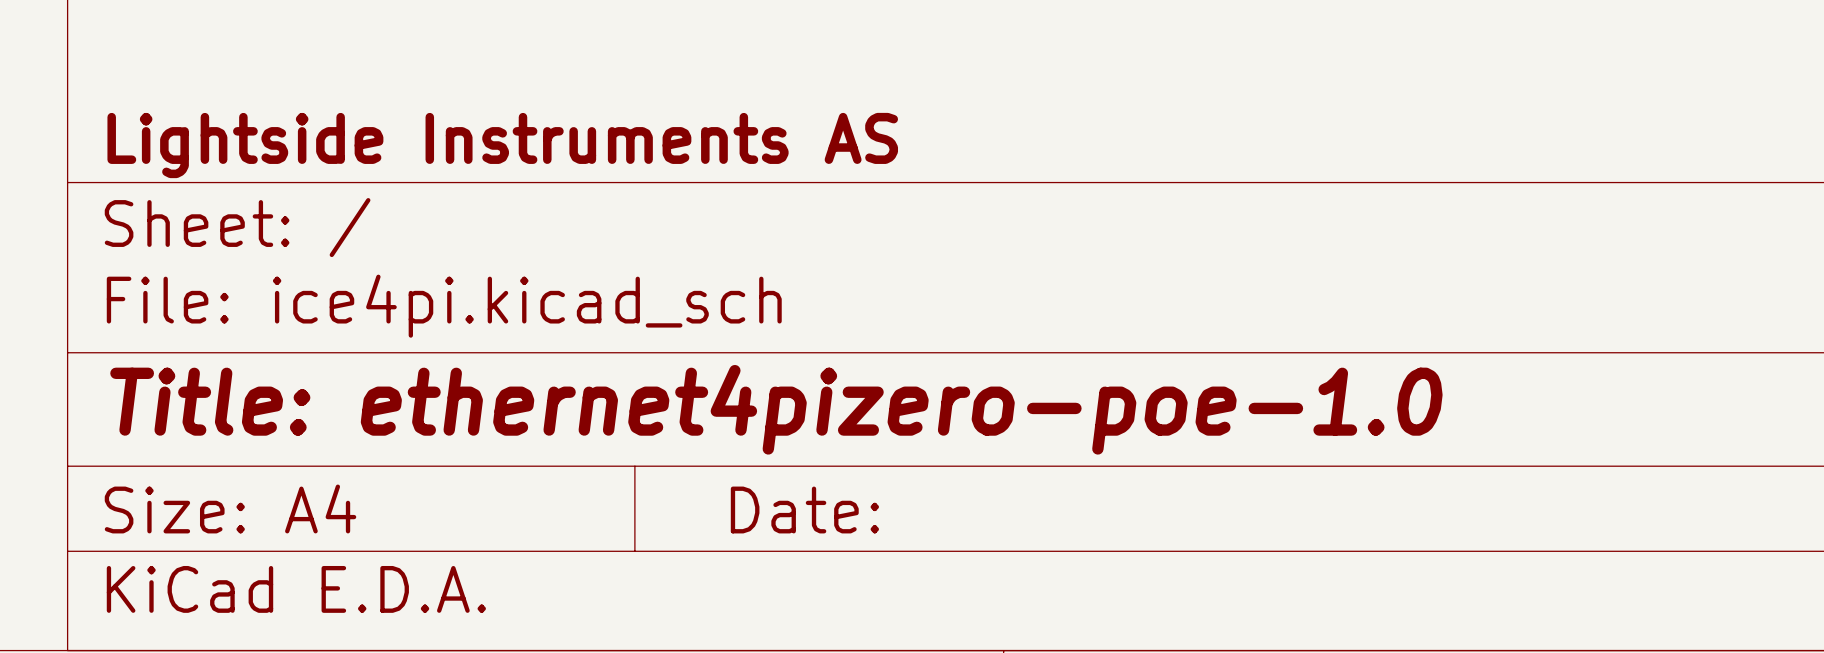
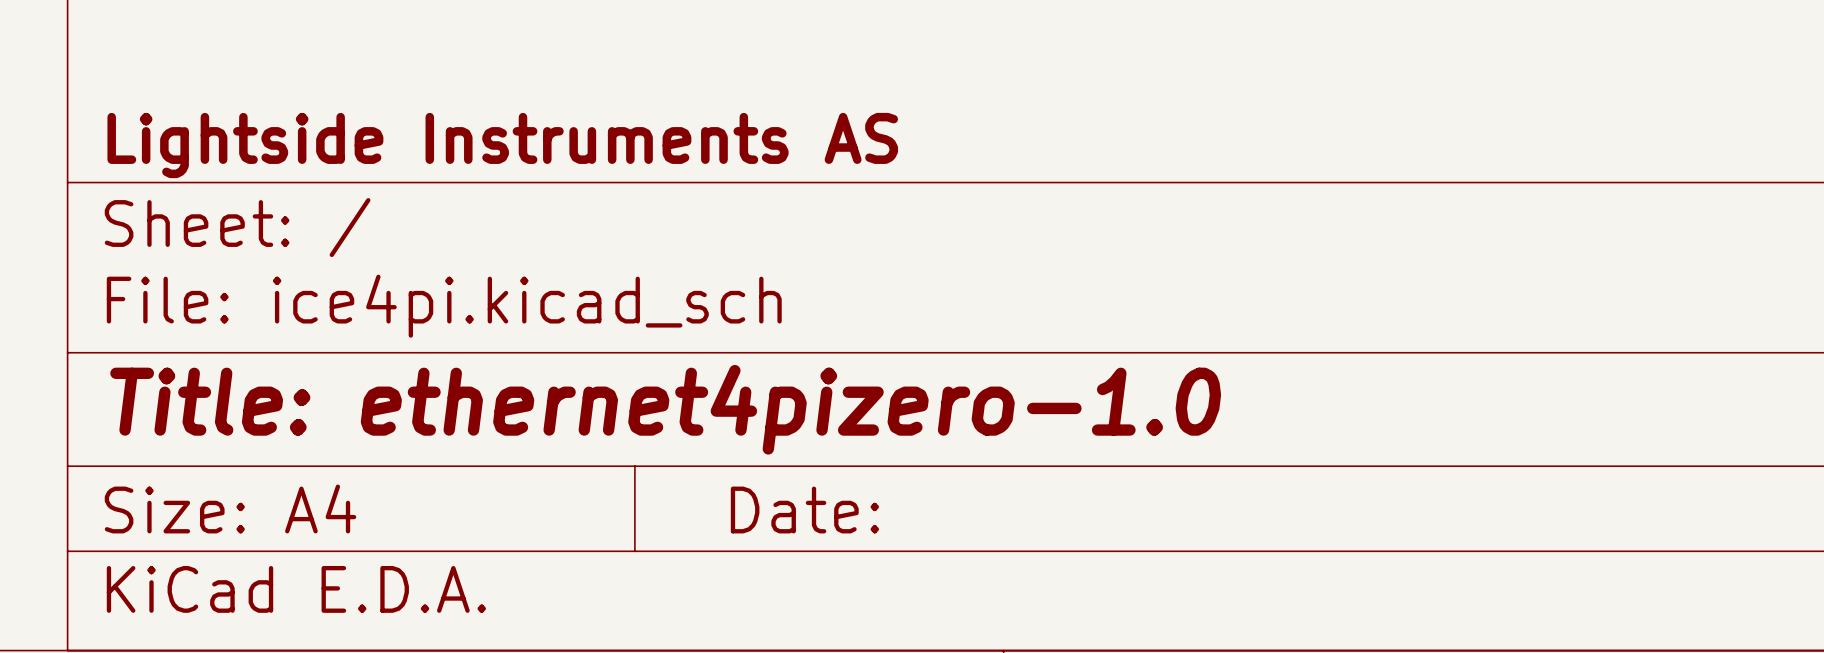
title block: Title: ethernet4pizero-poe-1.0 (776, 409) -> Title: ethernet4pizero-1.0 (665, 409)

